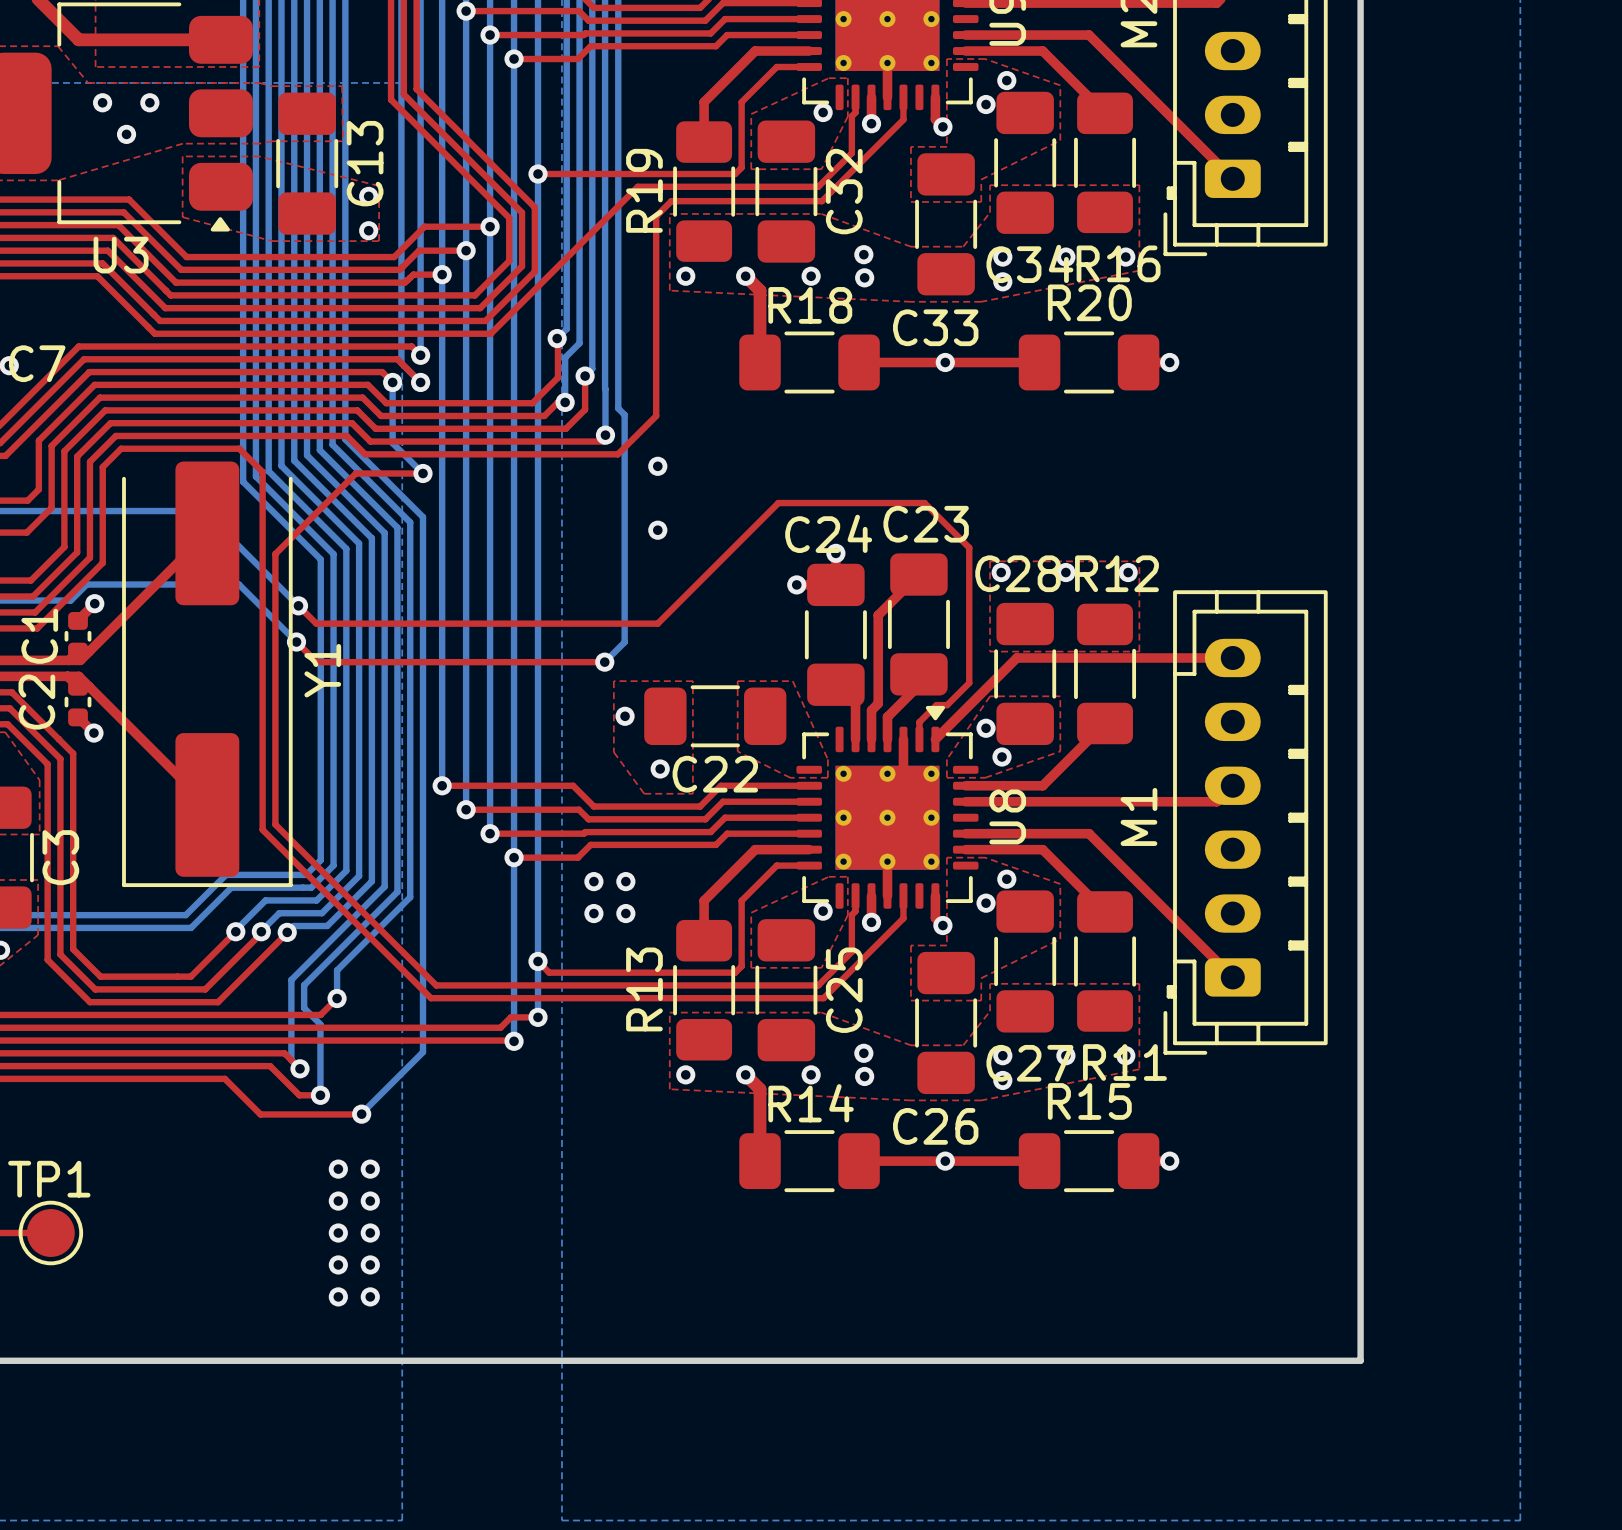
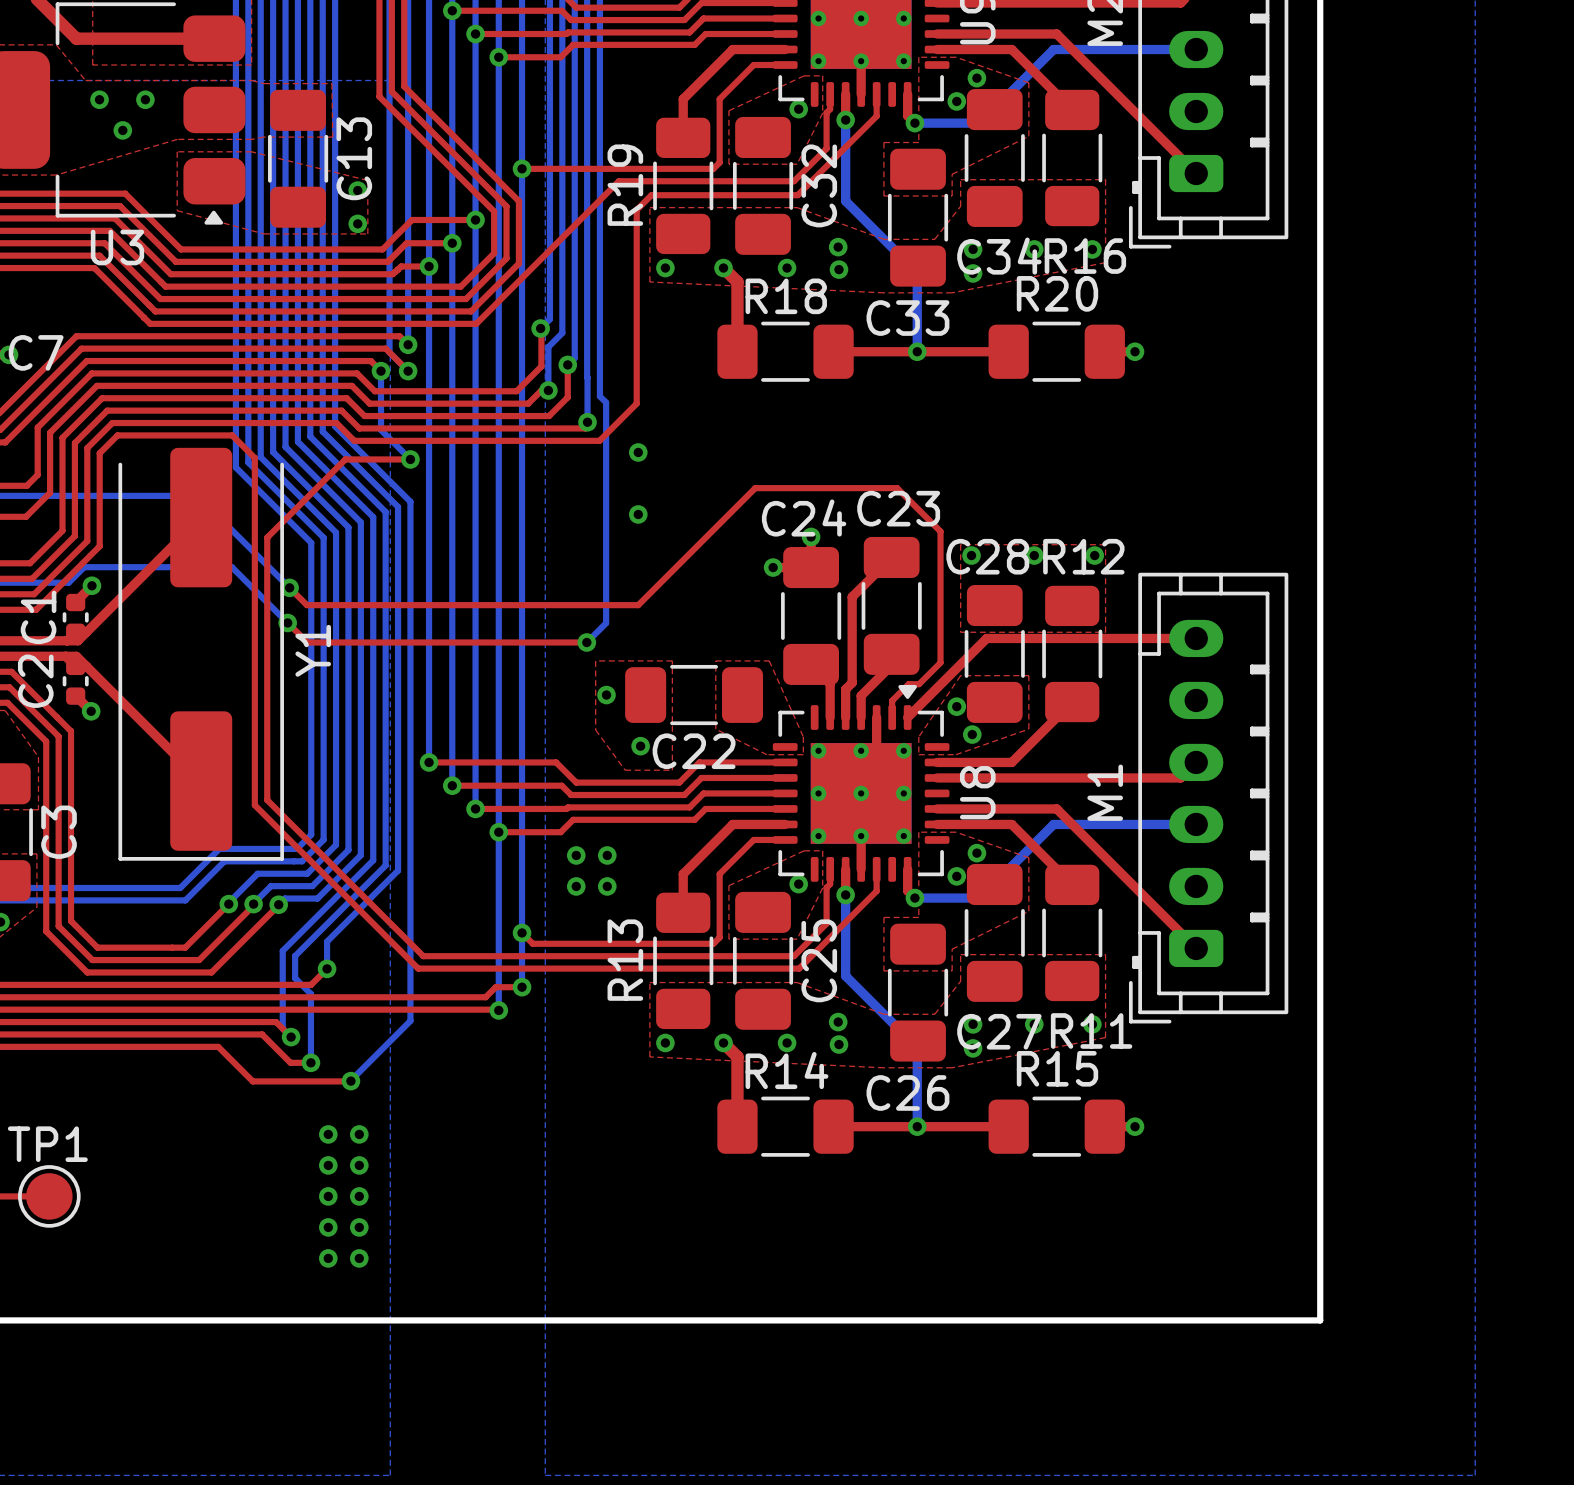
bottom track: none -> (1196, 49) (1053, 49) (980, 123) (914, 123)
bottom track: none -> (845, 120) (845, 201) (917, 272) (917, 351)
bottom track: none -> (1196, 824) (1053, 824) (980, 898) (914, 898)
bottom track: none -> (845, 894) (845, 976) (917, 1047) (917, 1126)

